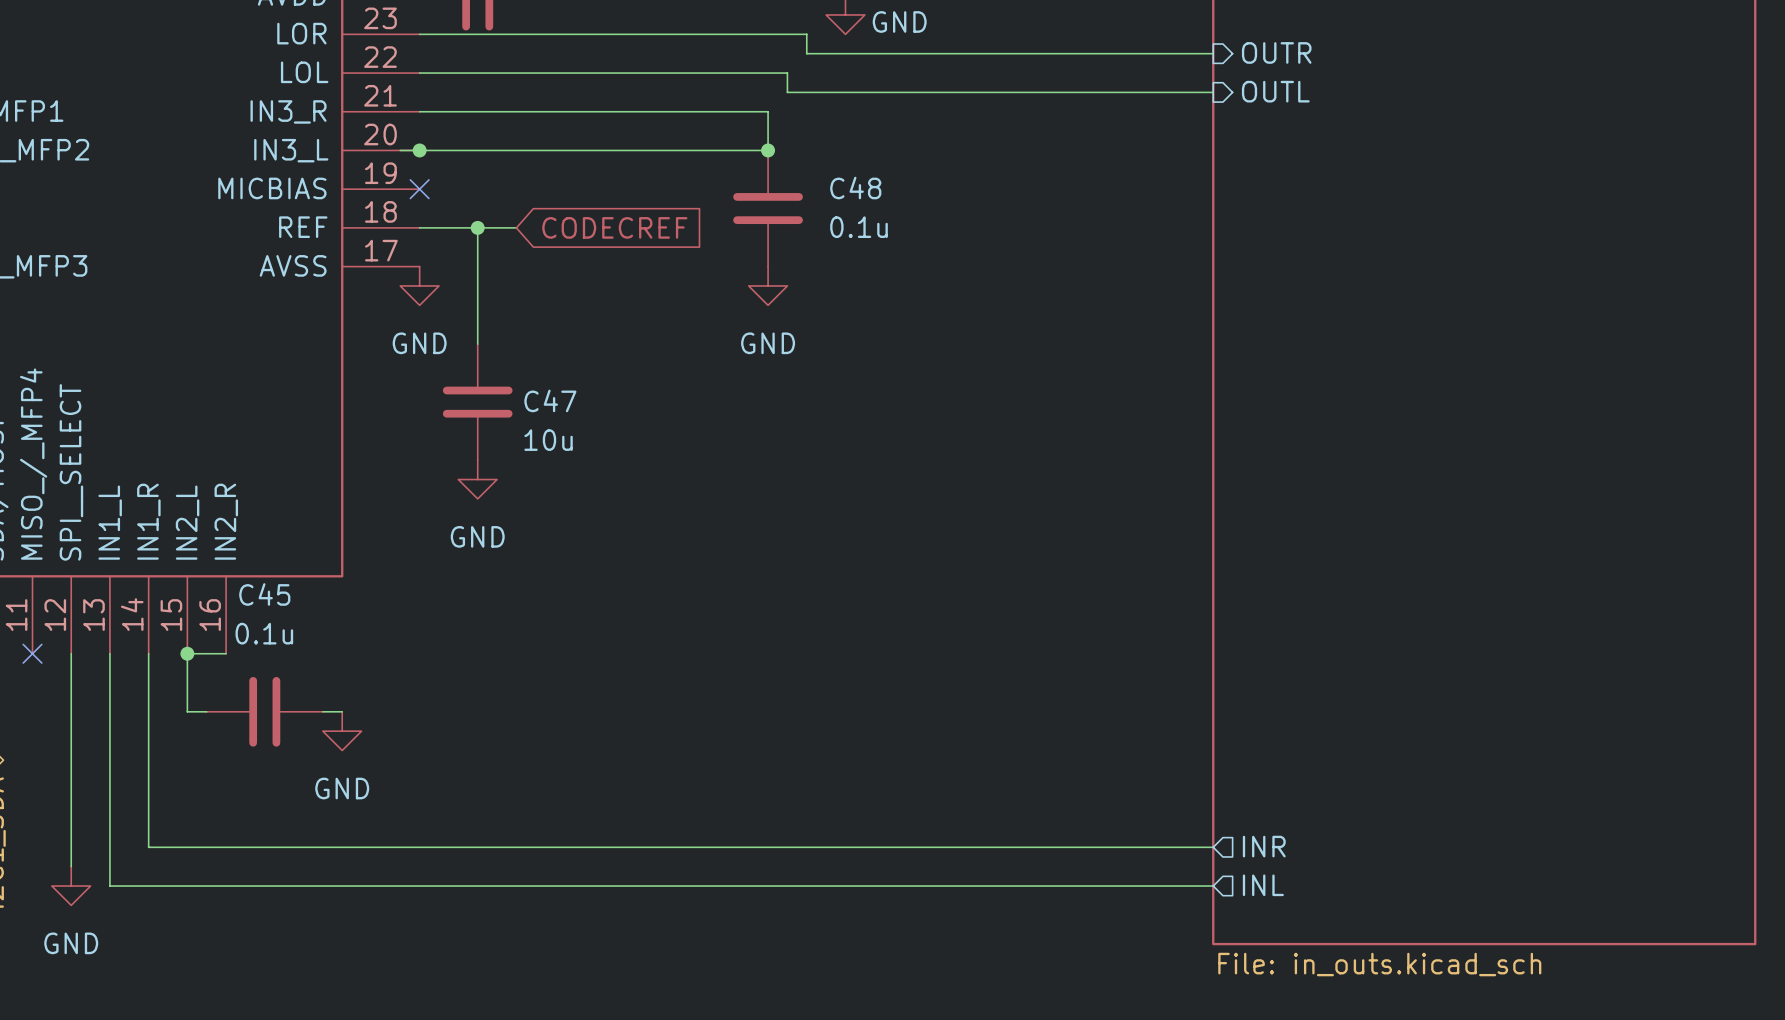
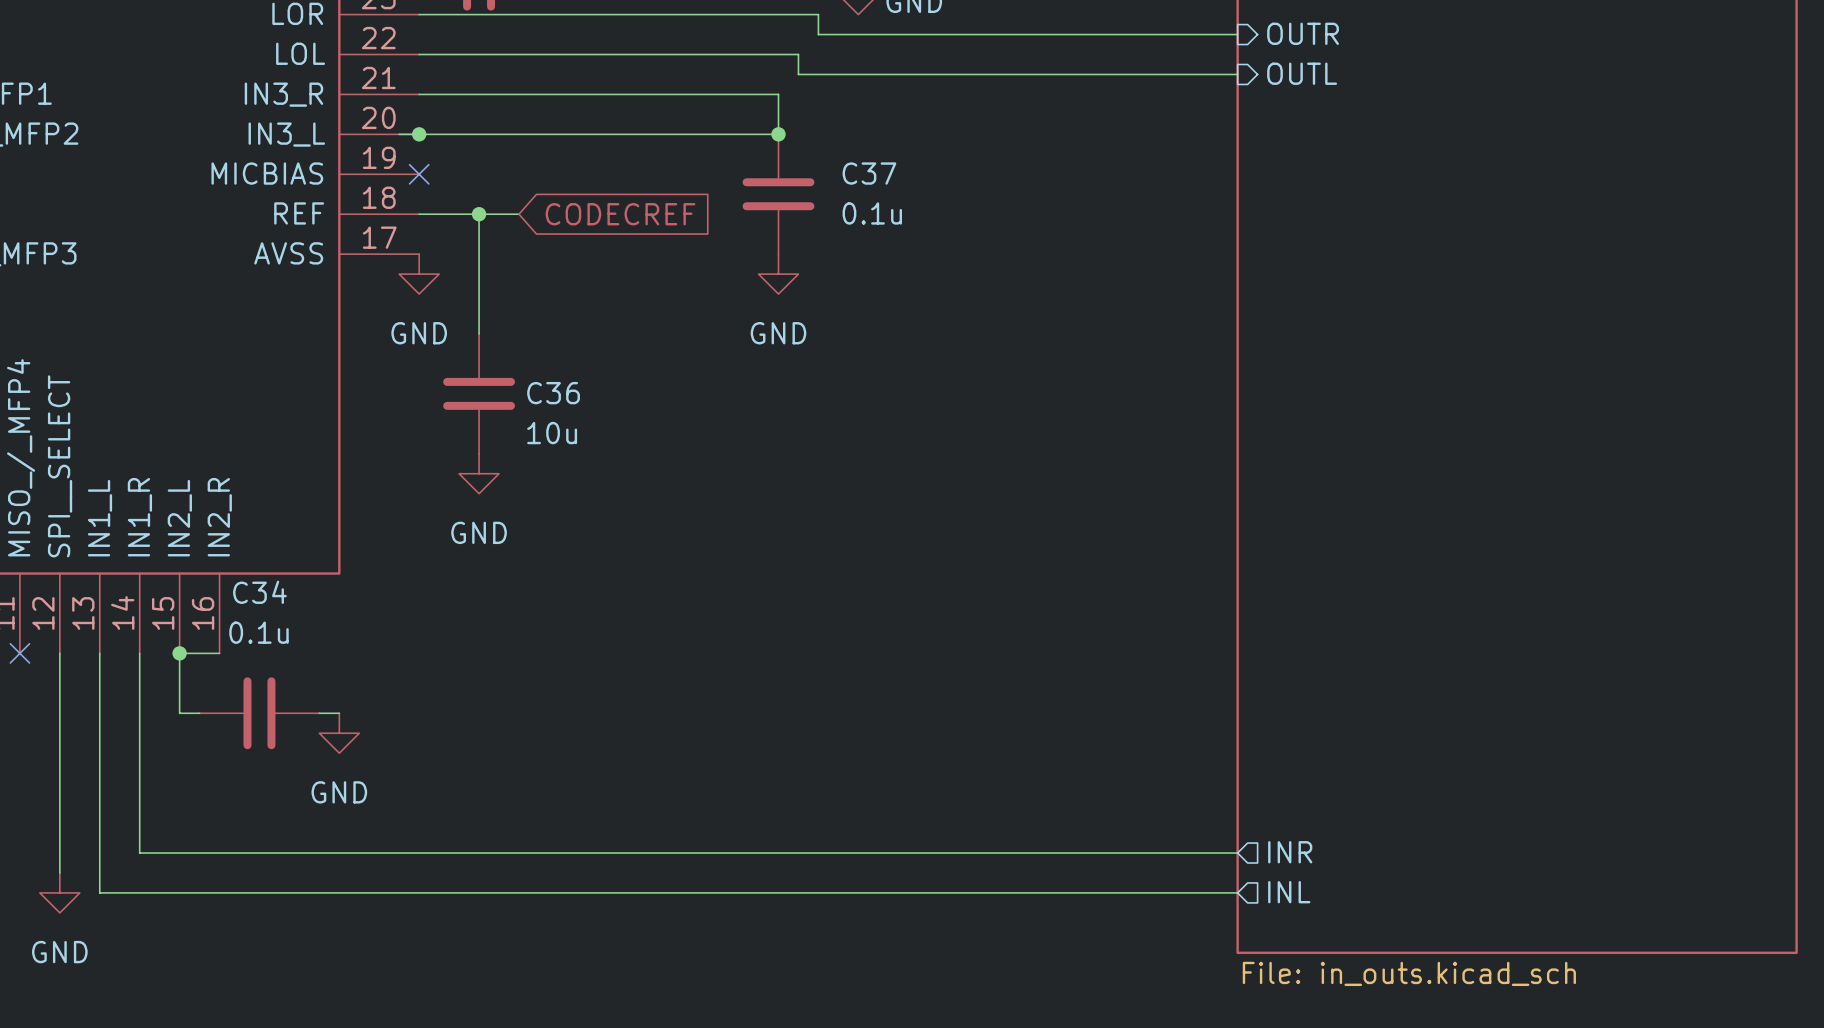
C48 name: C48 (855, 188) -> C37 (869, 173)
C47 name: C47 (550, 400) -> C36 (553, 393)
C45 name: C45 (264, 594) -> C34 (259, 592)

